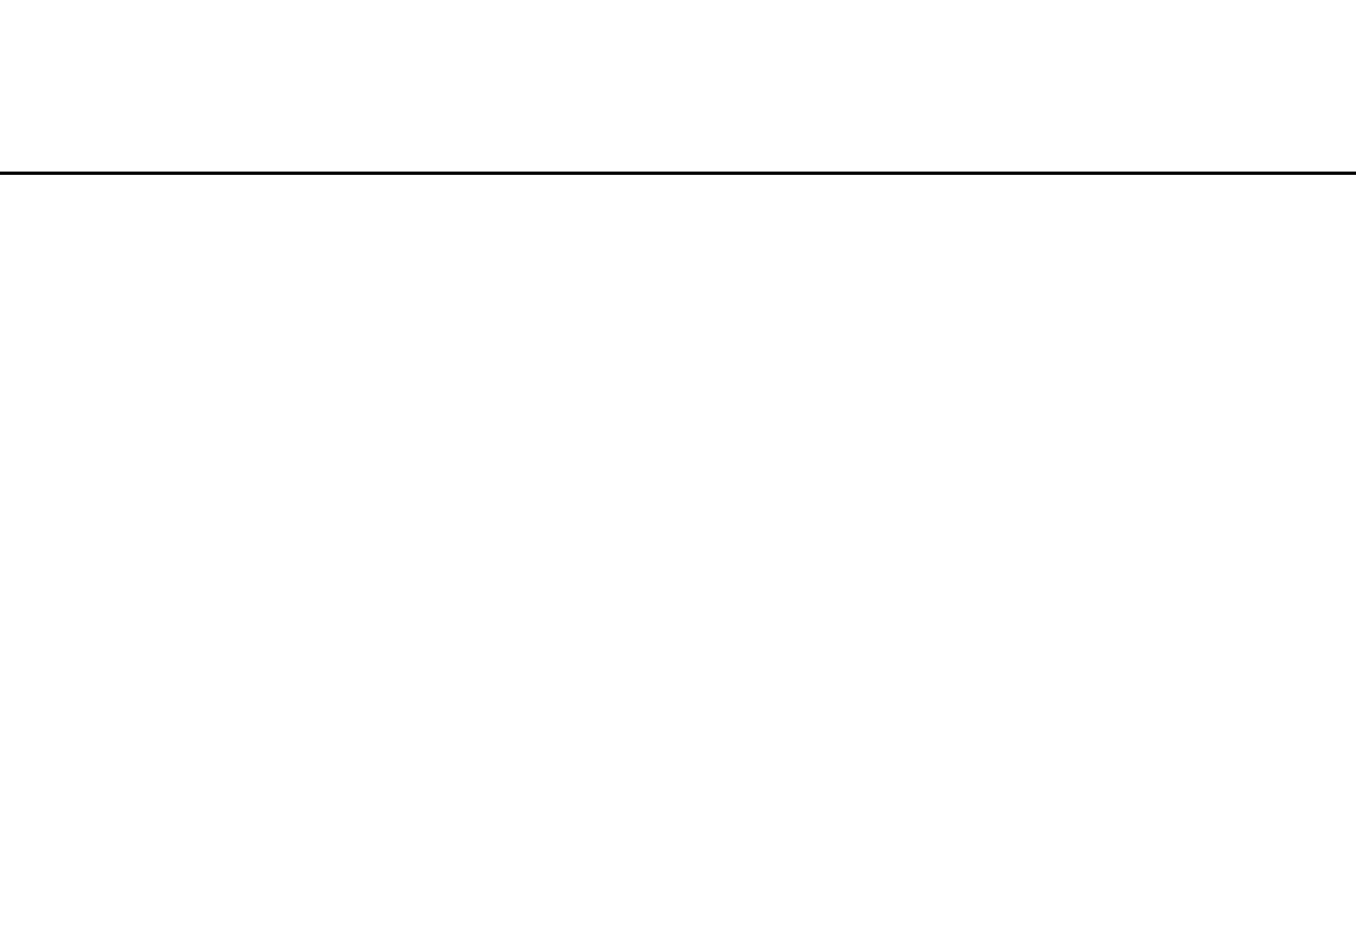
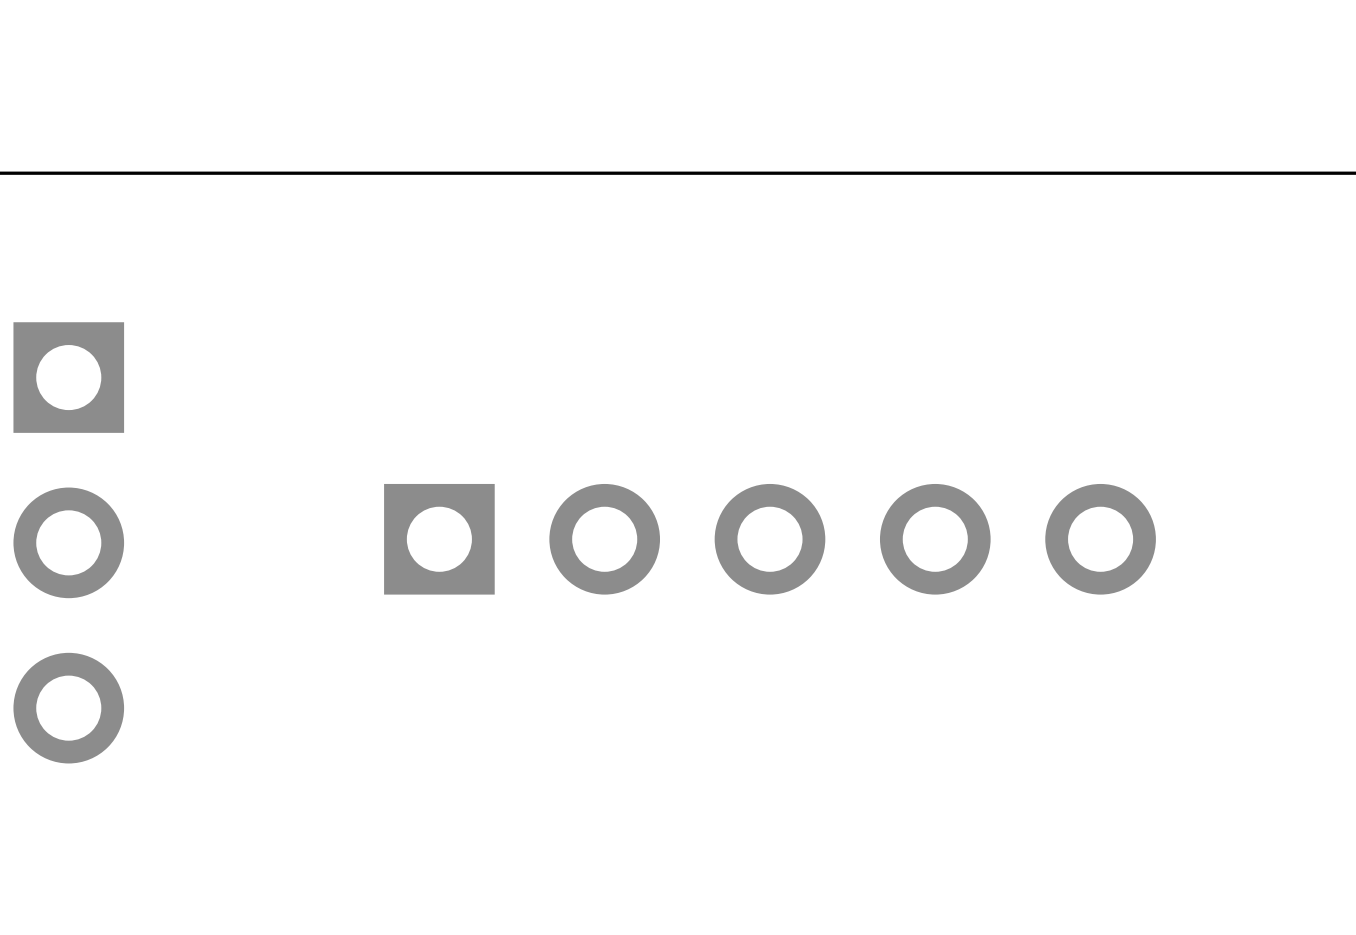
part: none -> (769, 539)
part: none -> (68, 542)

